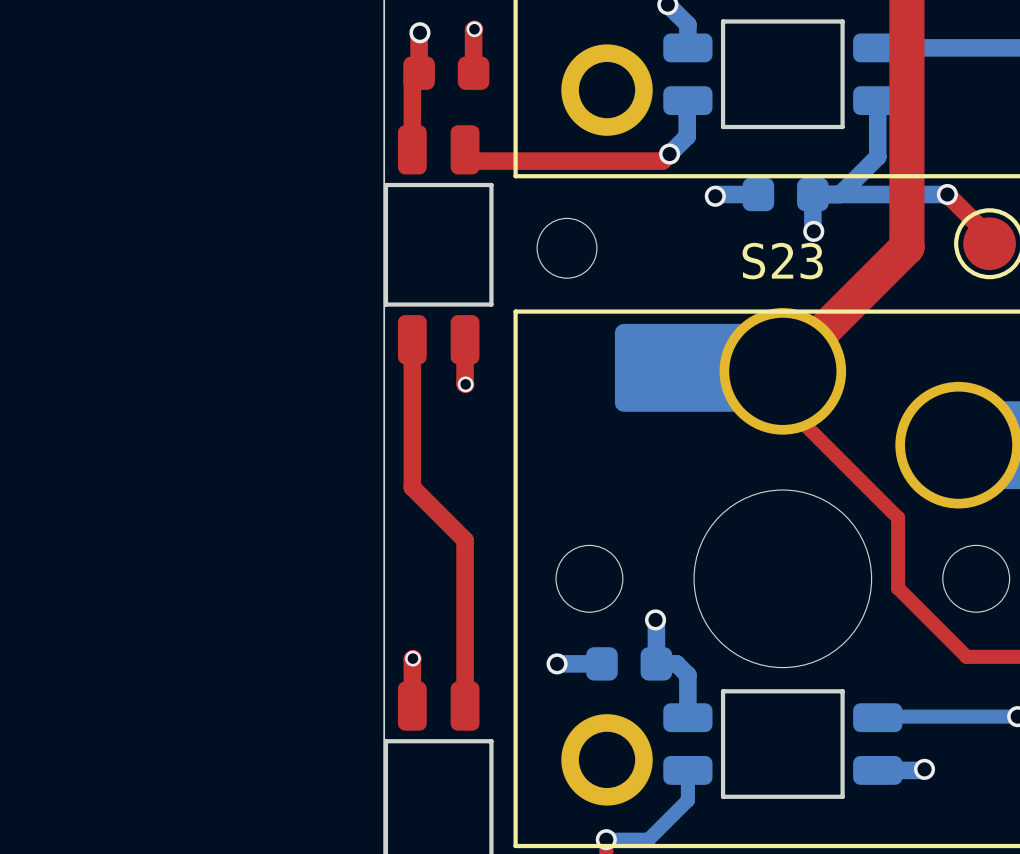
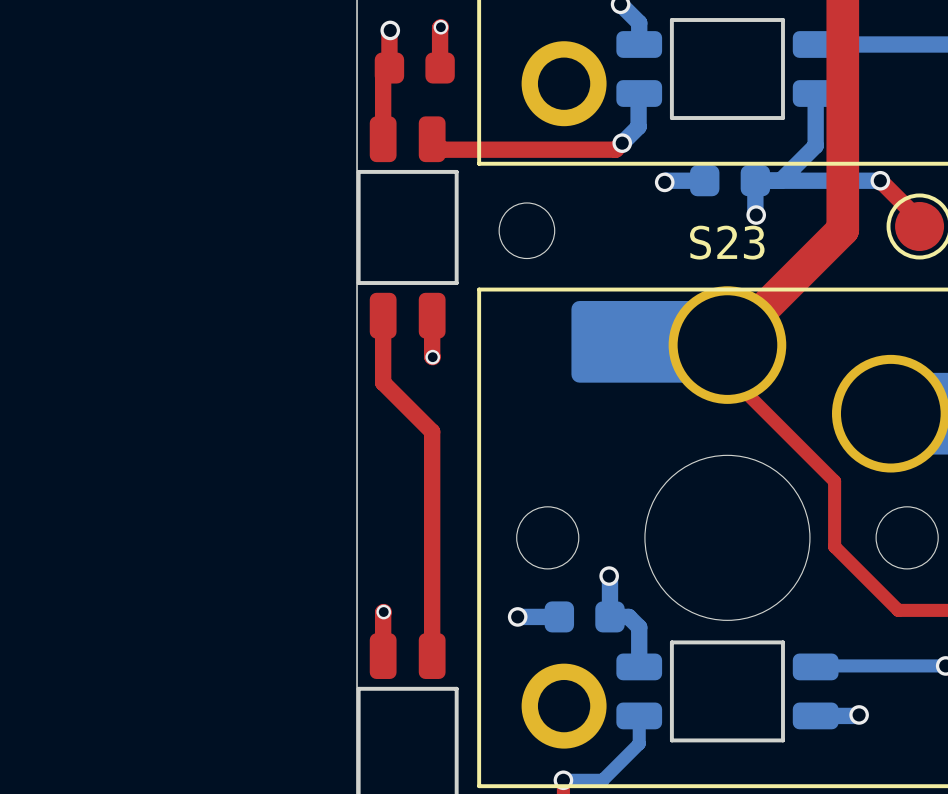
top track: (412, 411) (412, 487) (465, 540) -> (383, 382) (432, 431) (432, 501)

